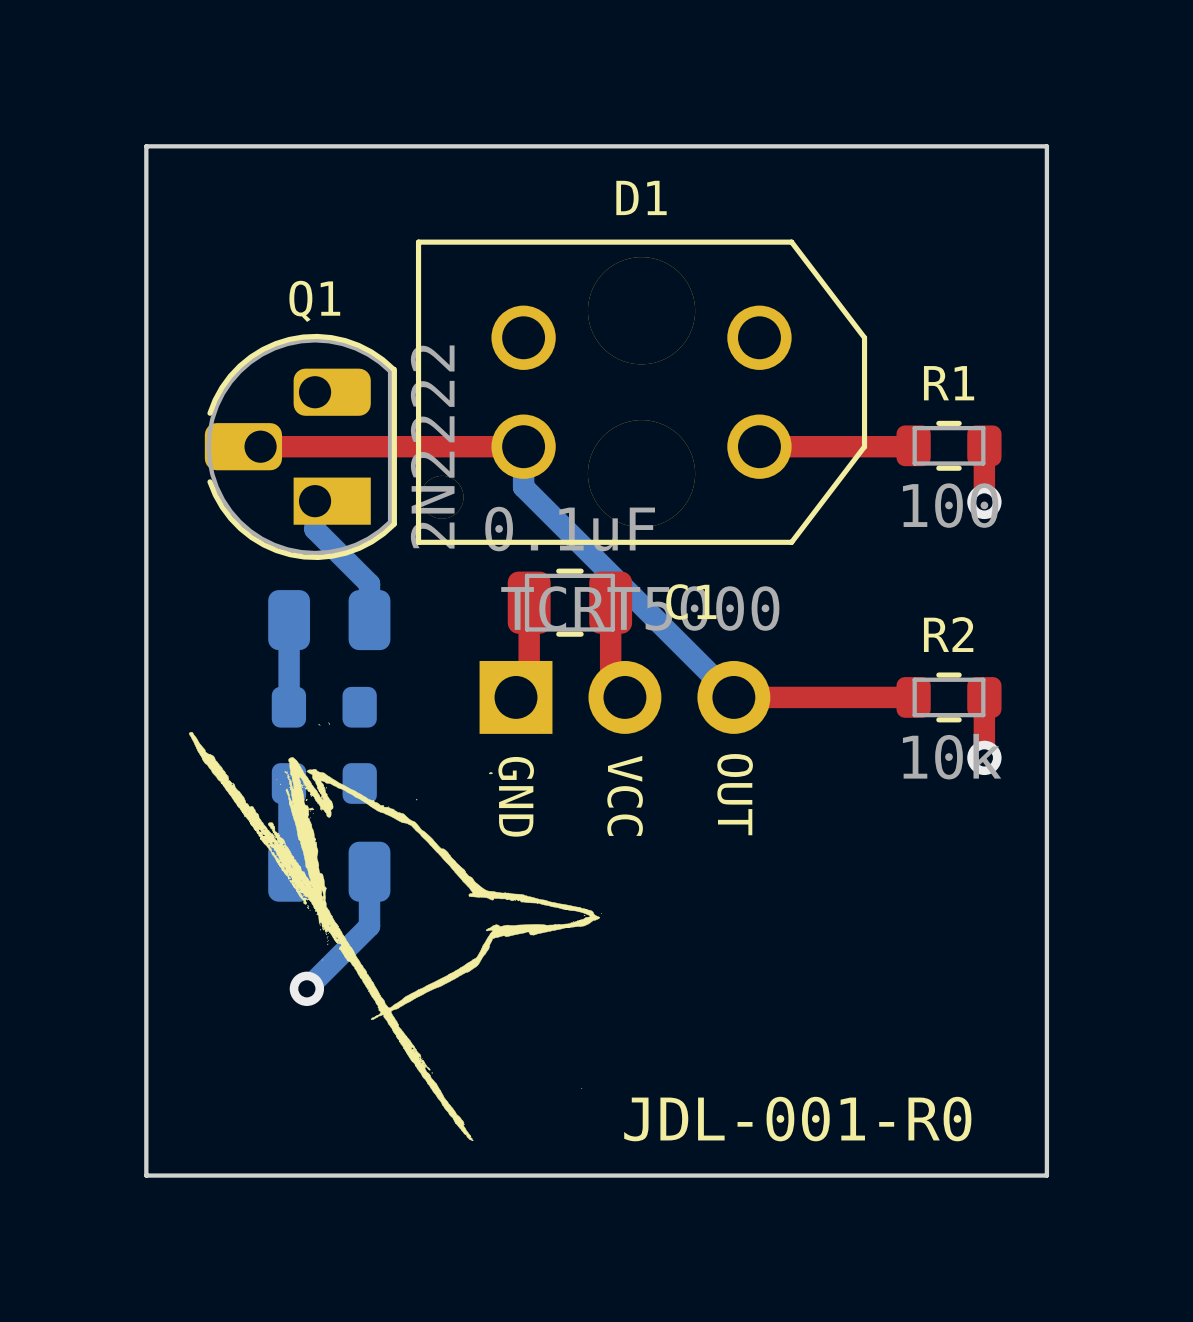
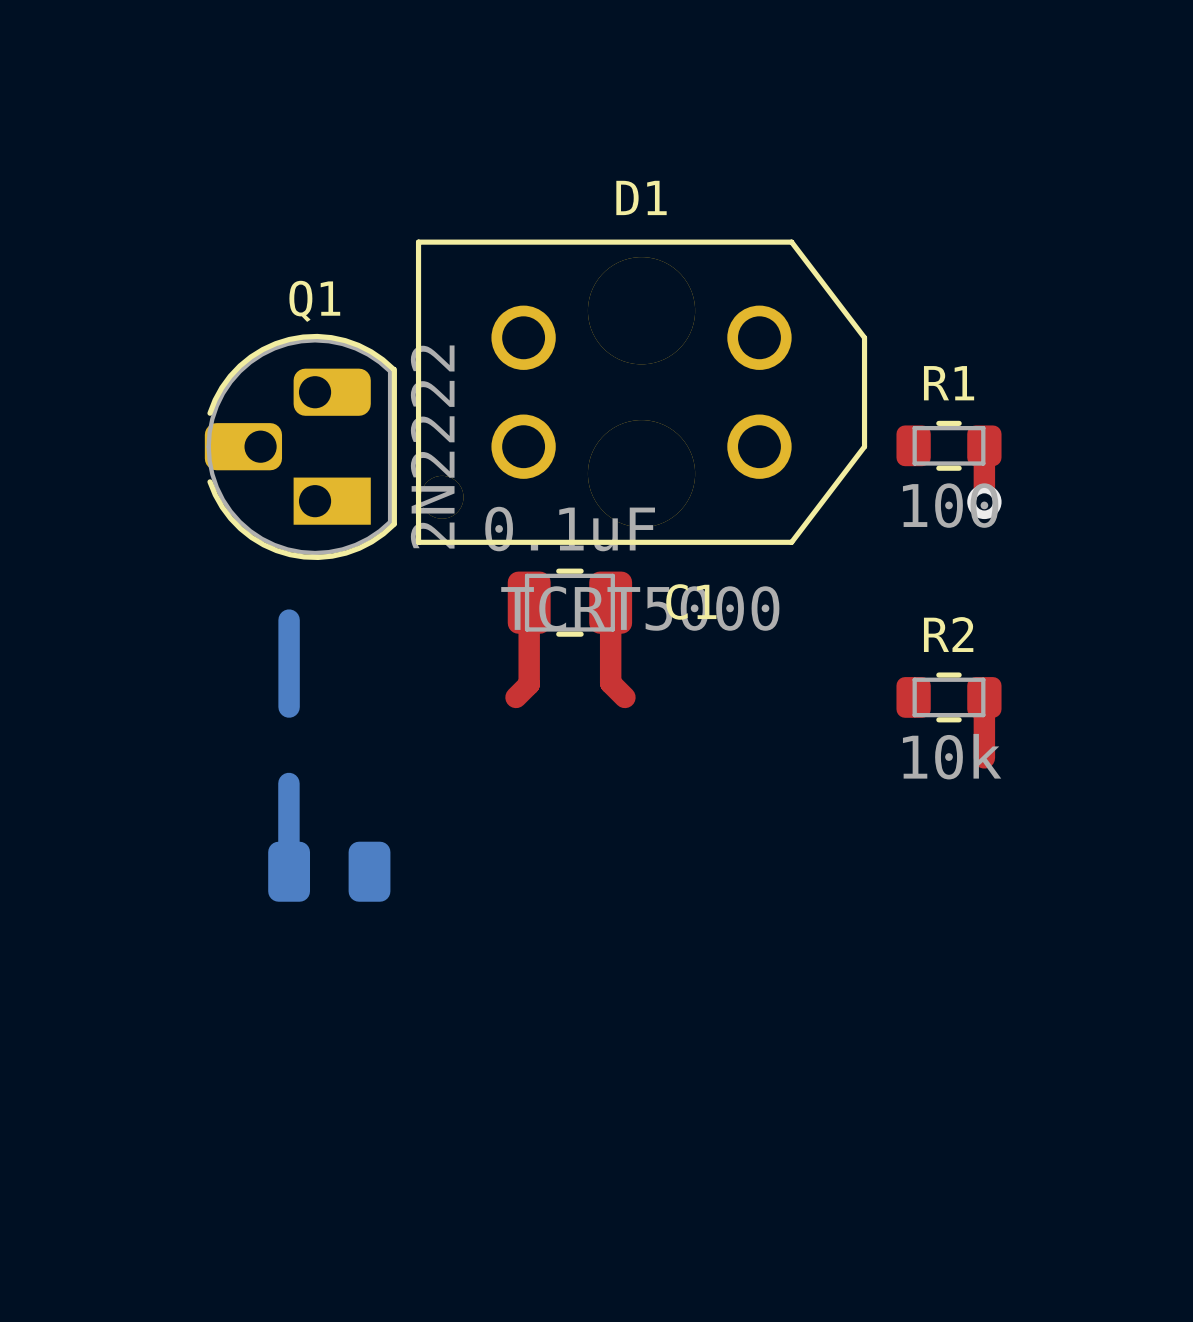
board edge: (146, 146) (146, 1175) (1046, 1175) (1046, 146) (146, 146) -> none
top track: (913, 445) (759, 446) -> none
top track: (260, 446) (523, 446) -> none
bottom track: (523, 446) (523, 487) (733, 697) -> none
bottom track: (315, 501) (315, 529) (369, 583) (369, 620) -> none
part: (329, 620) -> none
part: (624, 697) -> none
top track: (733, 697) (913, 697) -> none
part: (324, 707) -> none
drawing: [189, 722, 602, 1142] -> none
via: (984, 757) -> none
part: (324, 783) -> none
text: OUT (735, 794) -> none
text: VCC (625, 795) -> none
text: GND (516, 796) -> none
bottom track: (369, 871) (369, 926) (306, 988) -> none
via: (306, 988) -> none
text: JDL-001-R0 (797, 1119) -> none

